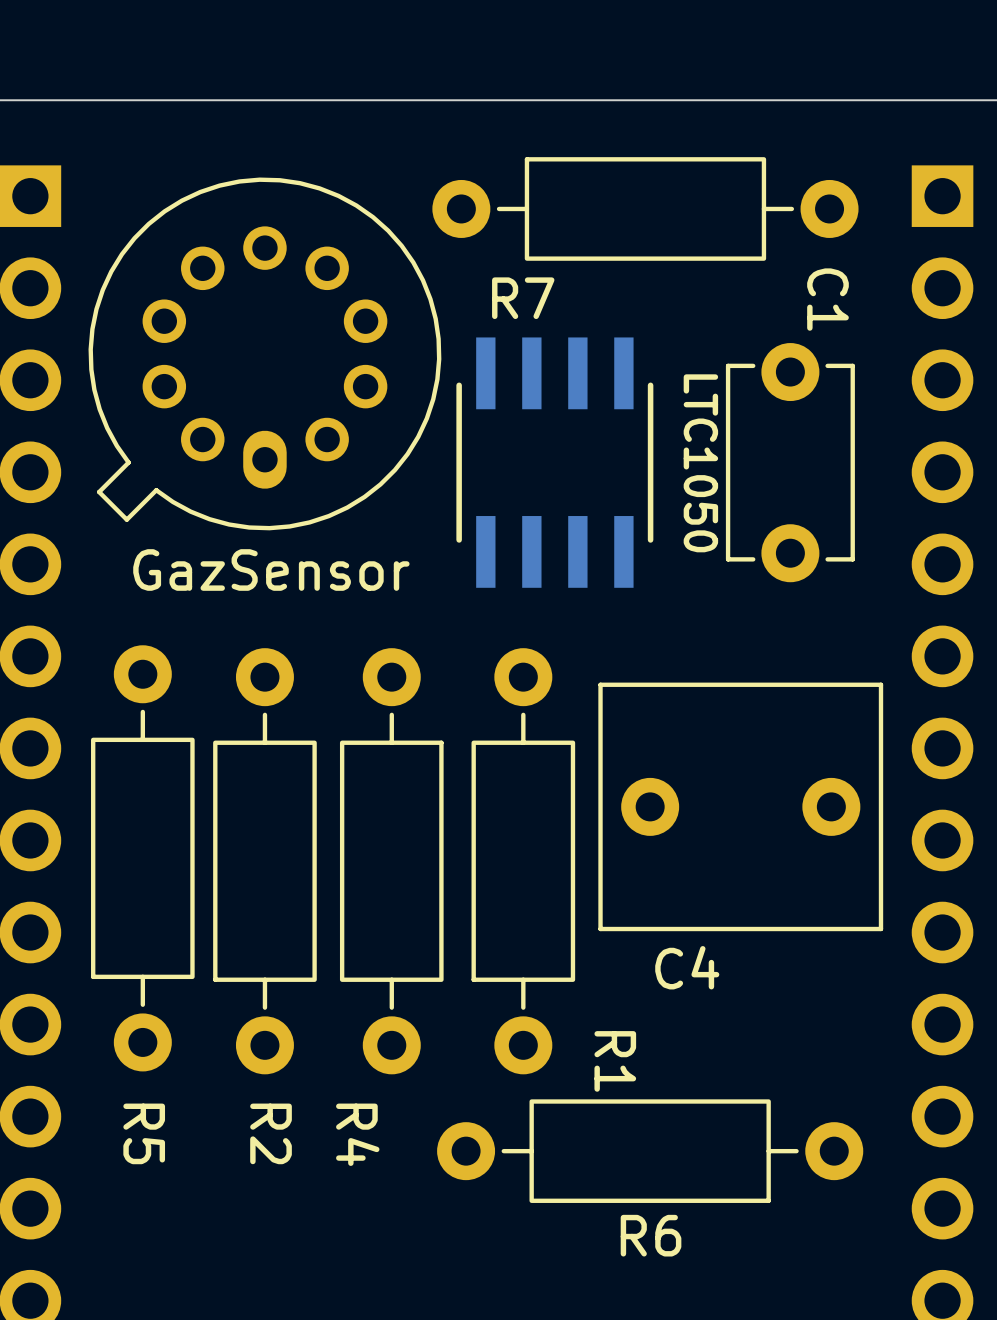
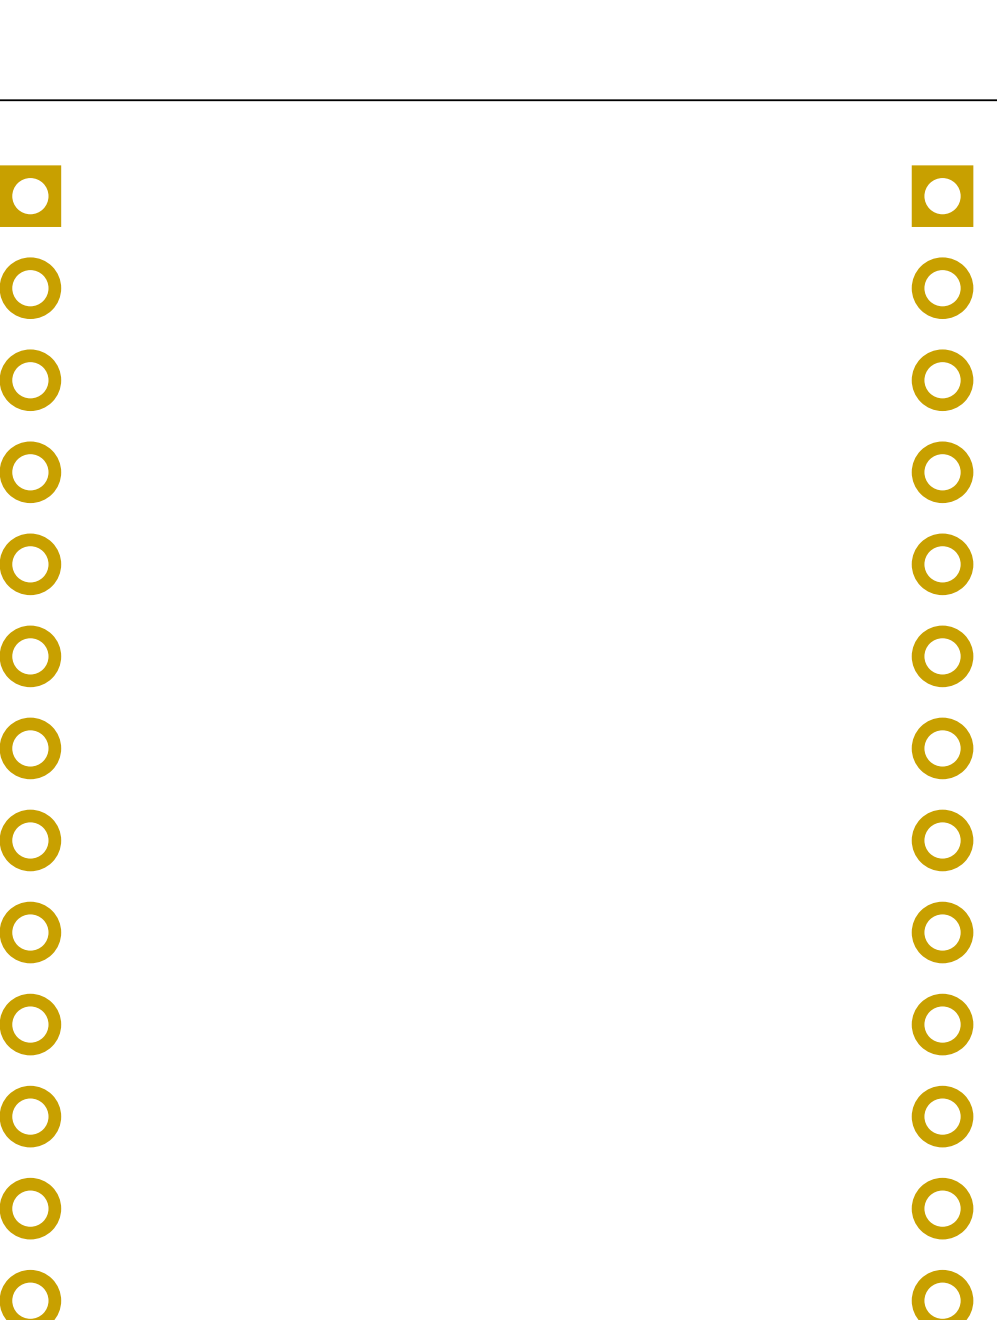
R7: (645, 208) -> none
GazSensor: (264, 353) -> none
LTC1050: (554, 462) -> none
C1: (790, 462) -> none
C4: (740, 806) -> none
R5: (142, 858) -> none
R2: (264, 861) -> none
R4: (391, 861) -> none
R1: (523, 861) -> none
R6: (650, 1151) -> none

